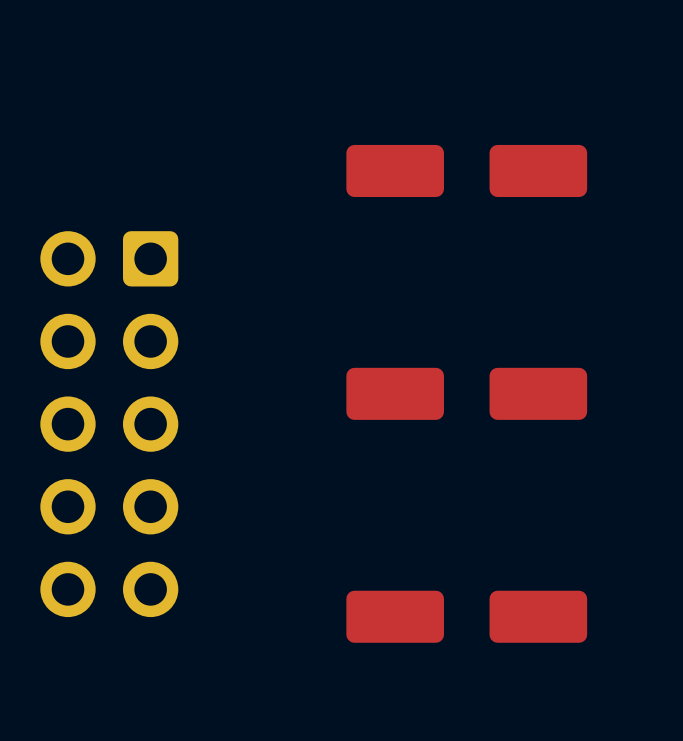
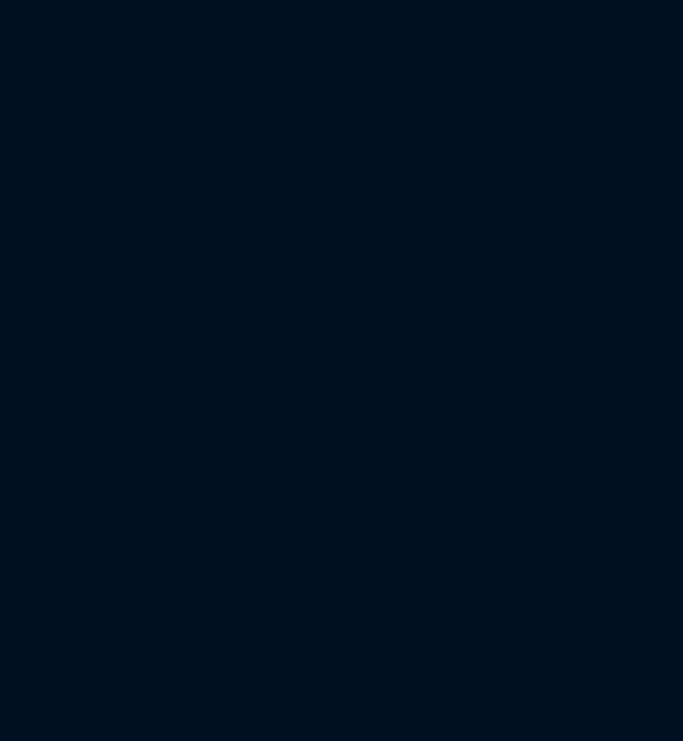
part: (466, 170) -> none
part: (466, 393) -> none
part: (109, 424) -> none
part: (466, 616) -> none

